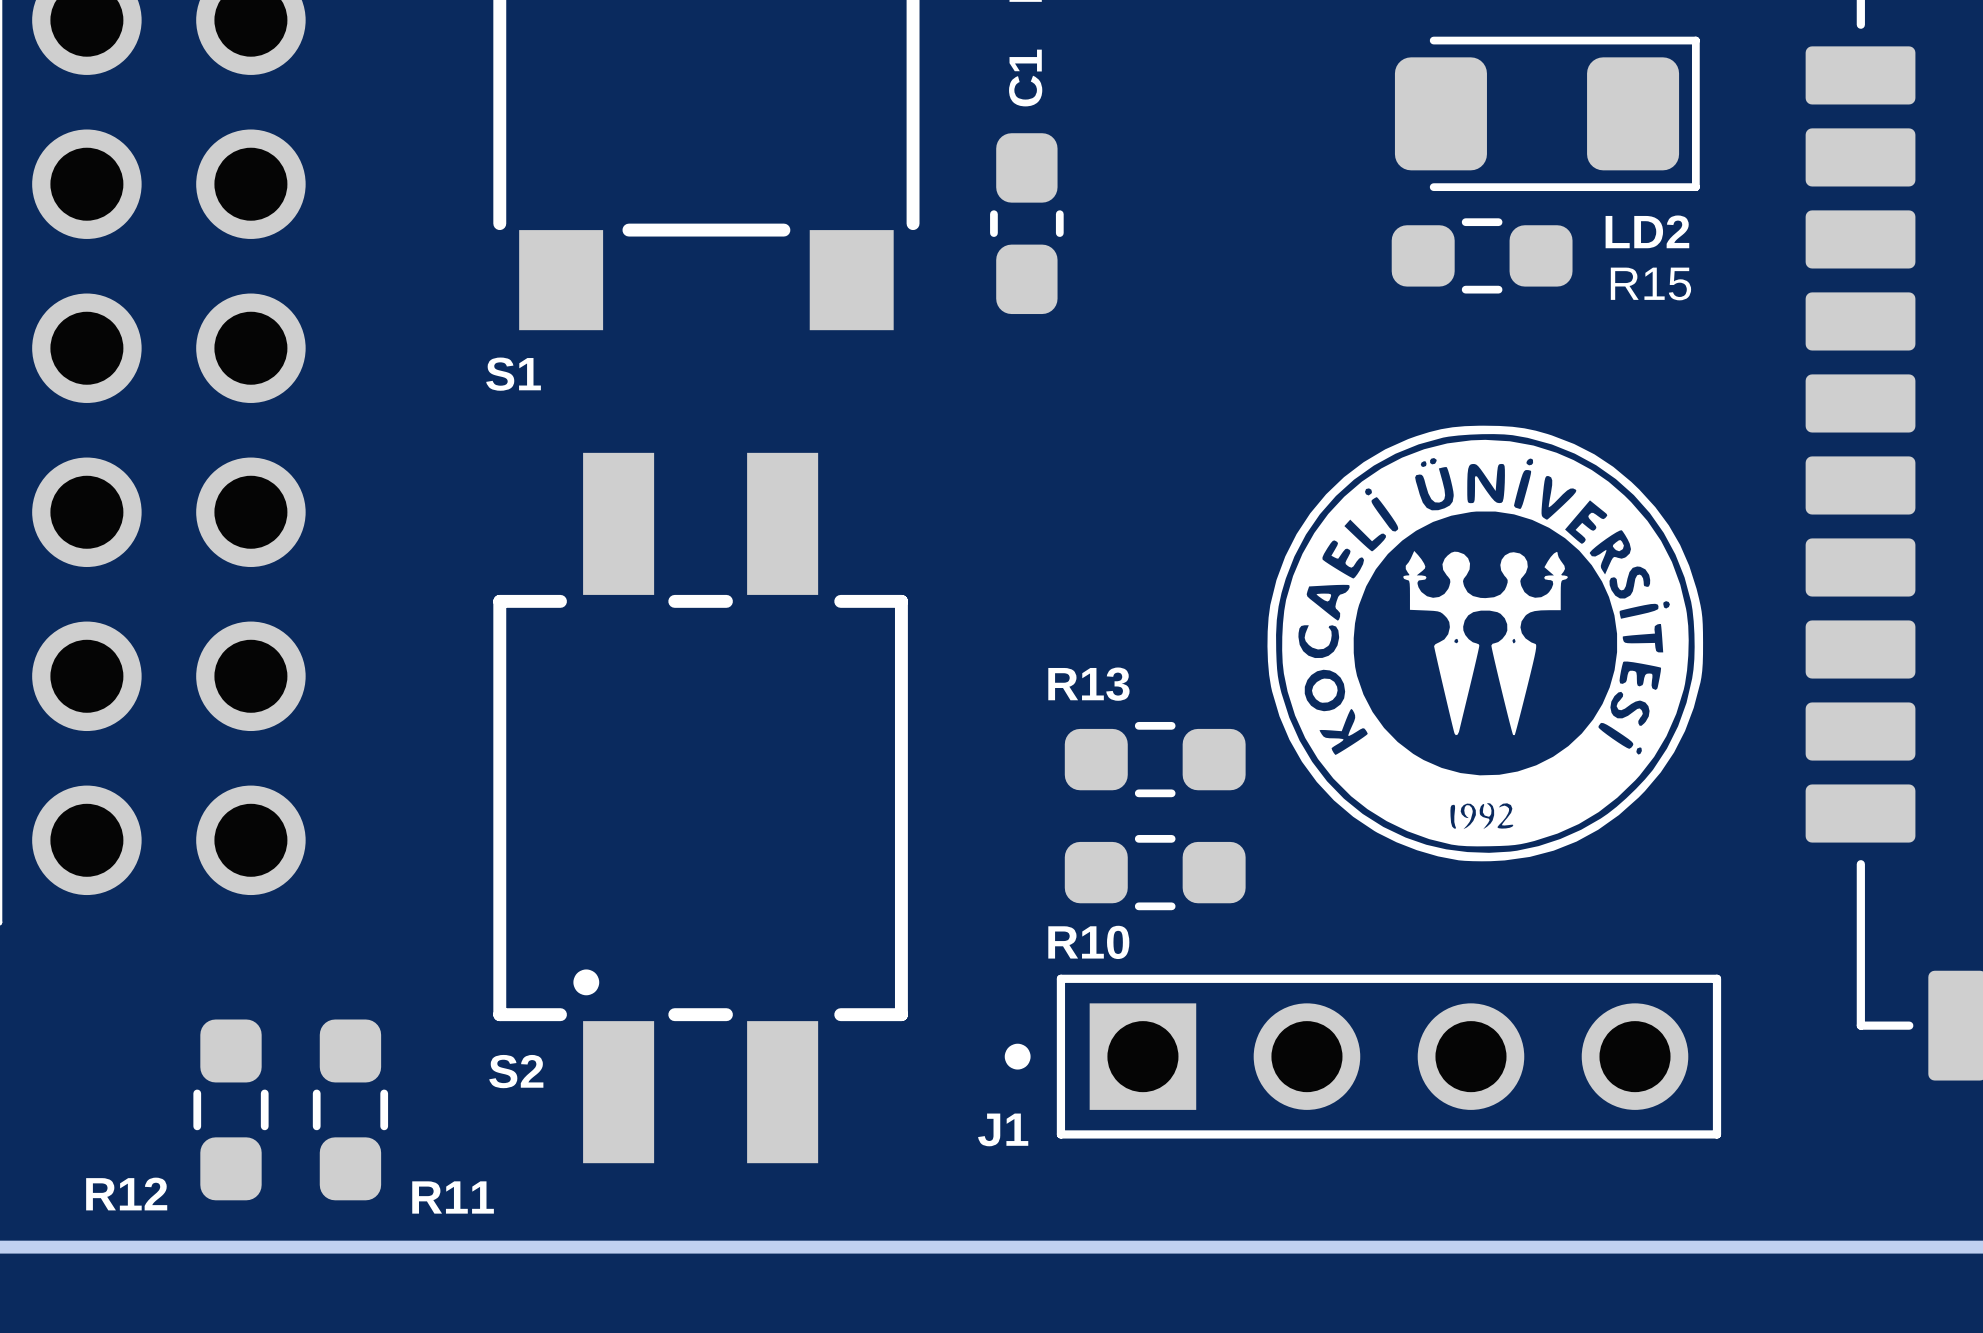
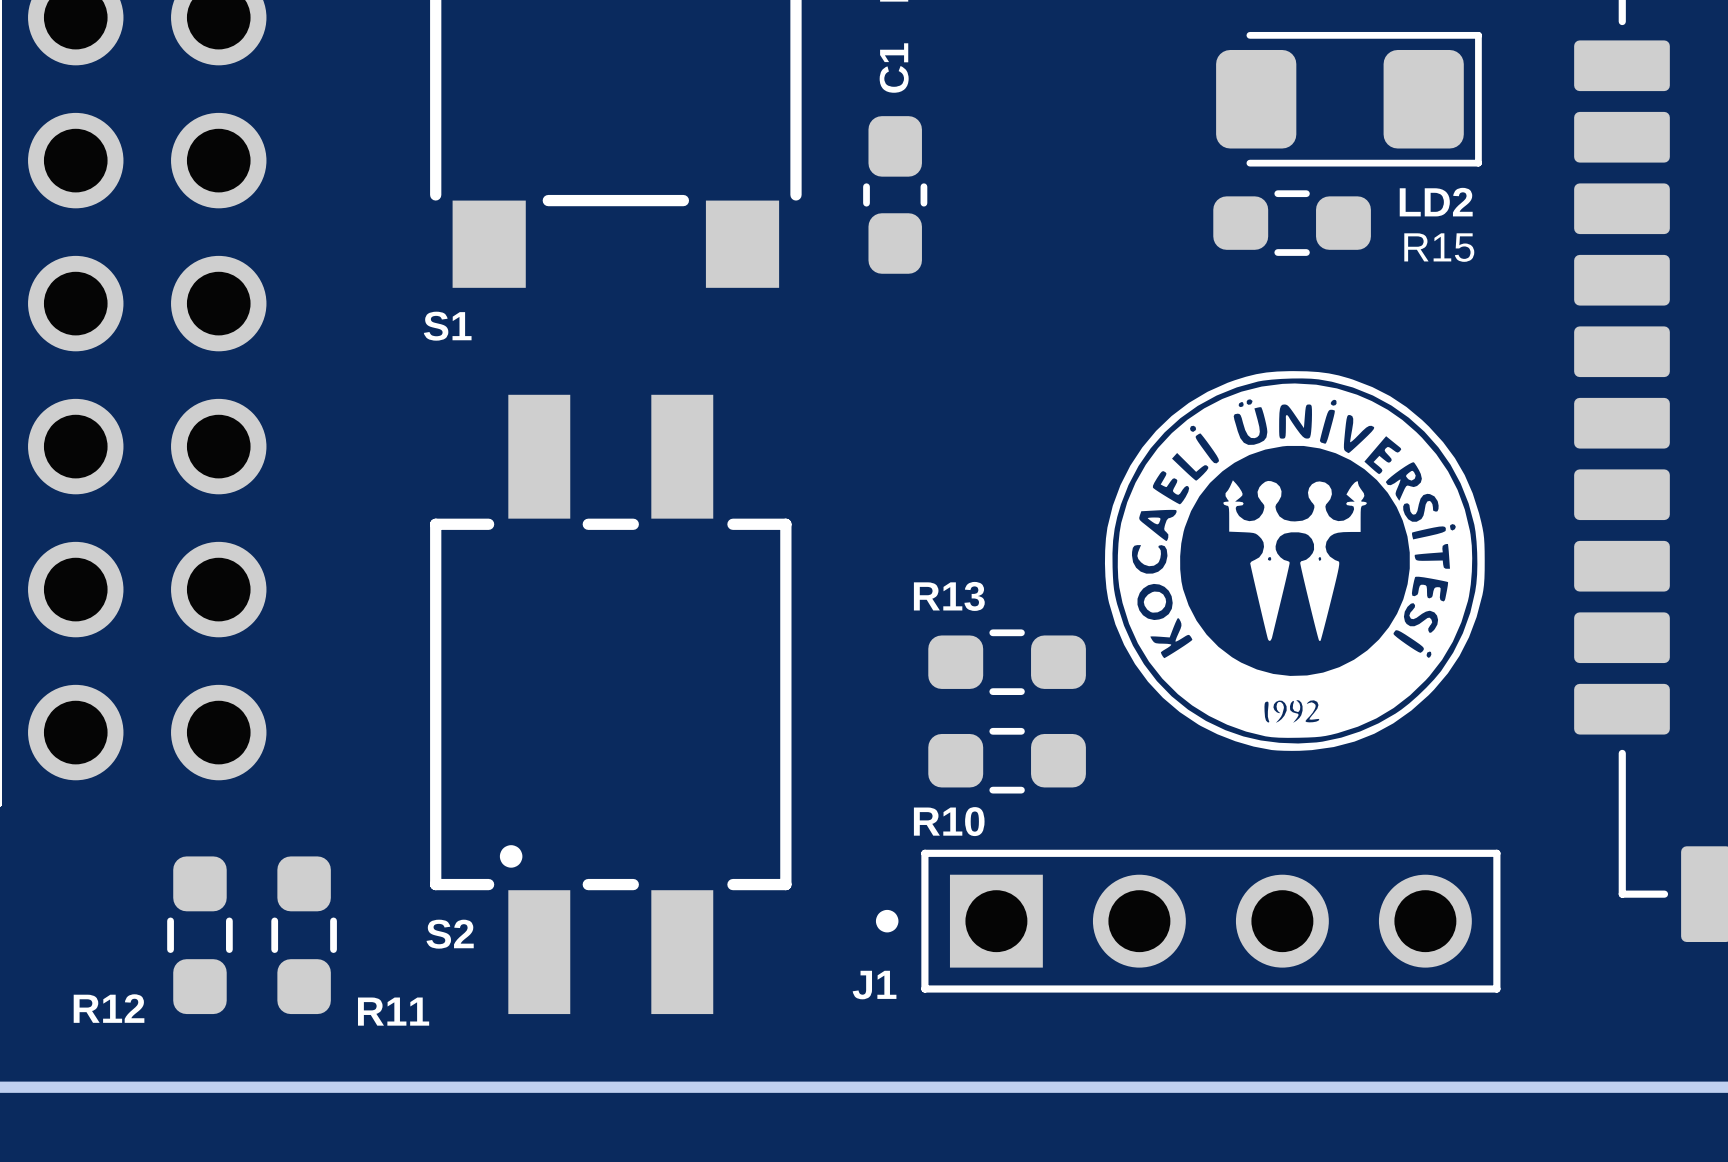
R12 position: (230, 1109) -> (199, 935)
R11 position: (350, 1109) -> (304, 935)

